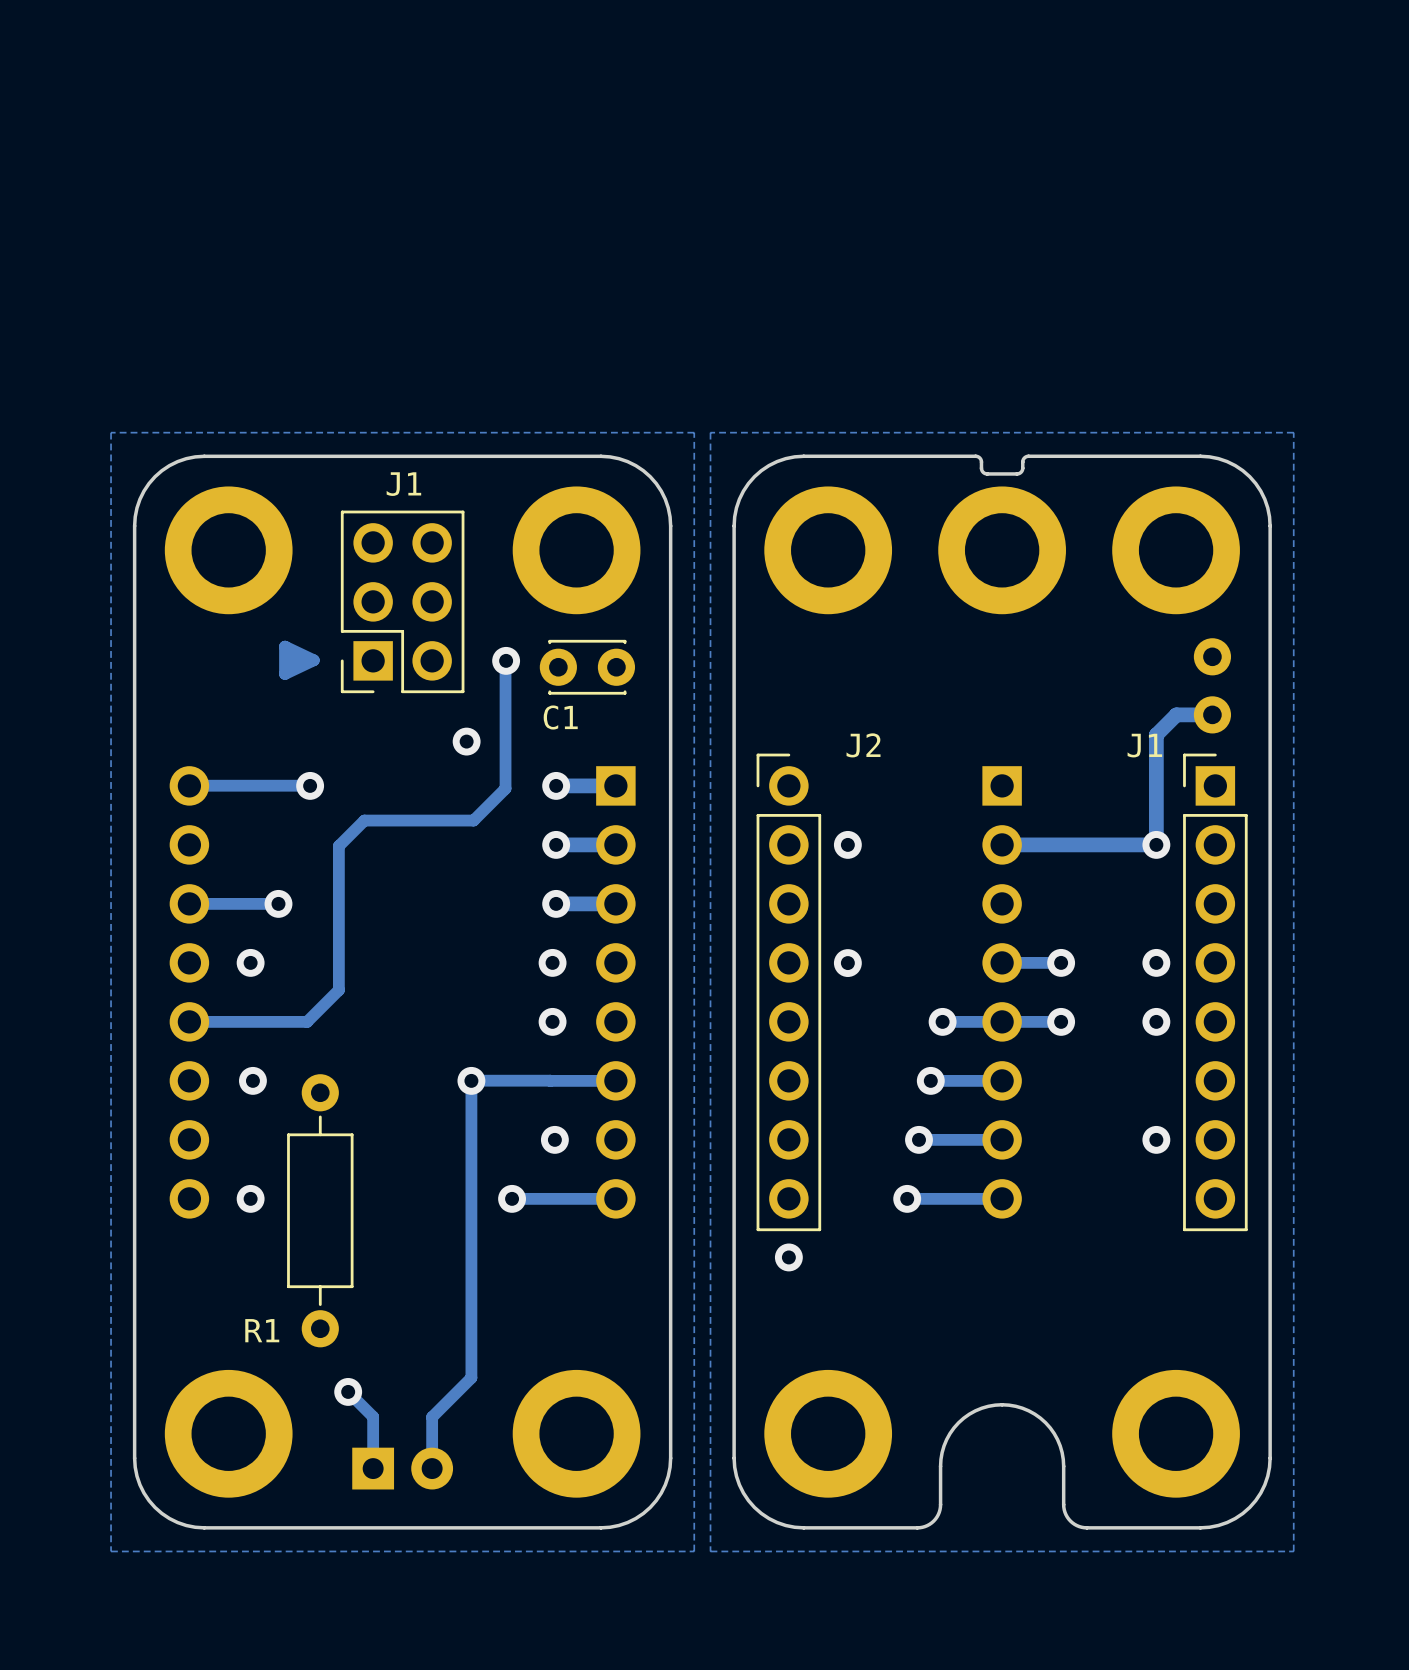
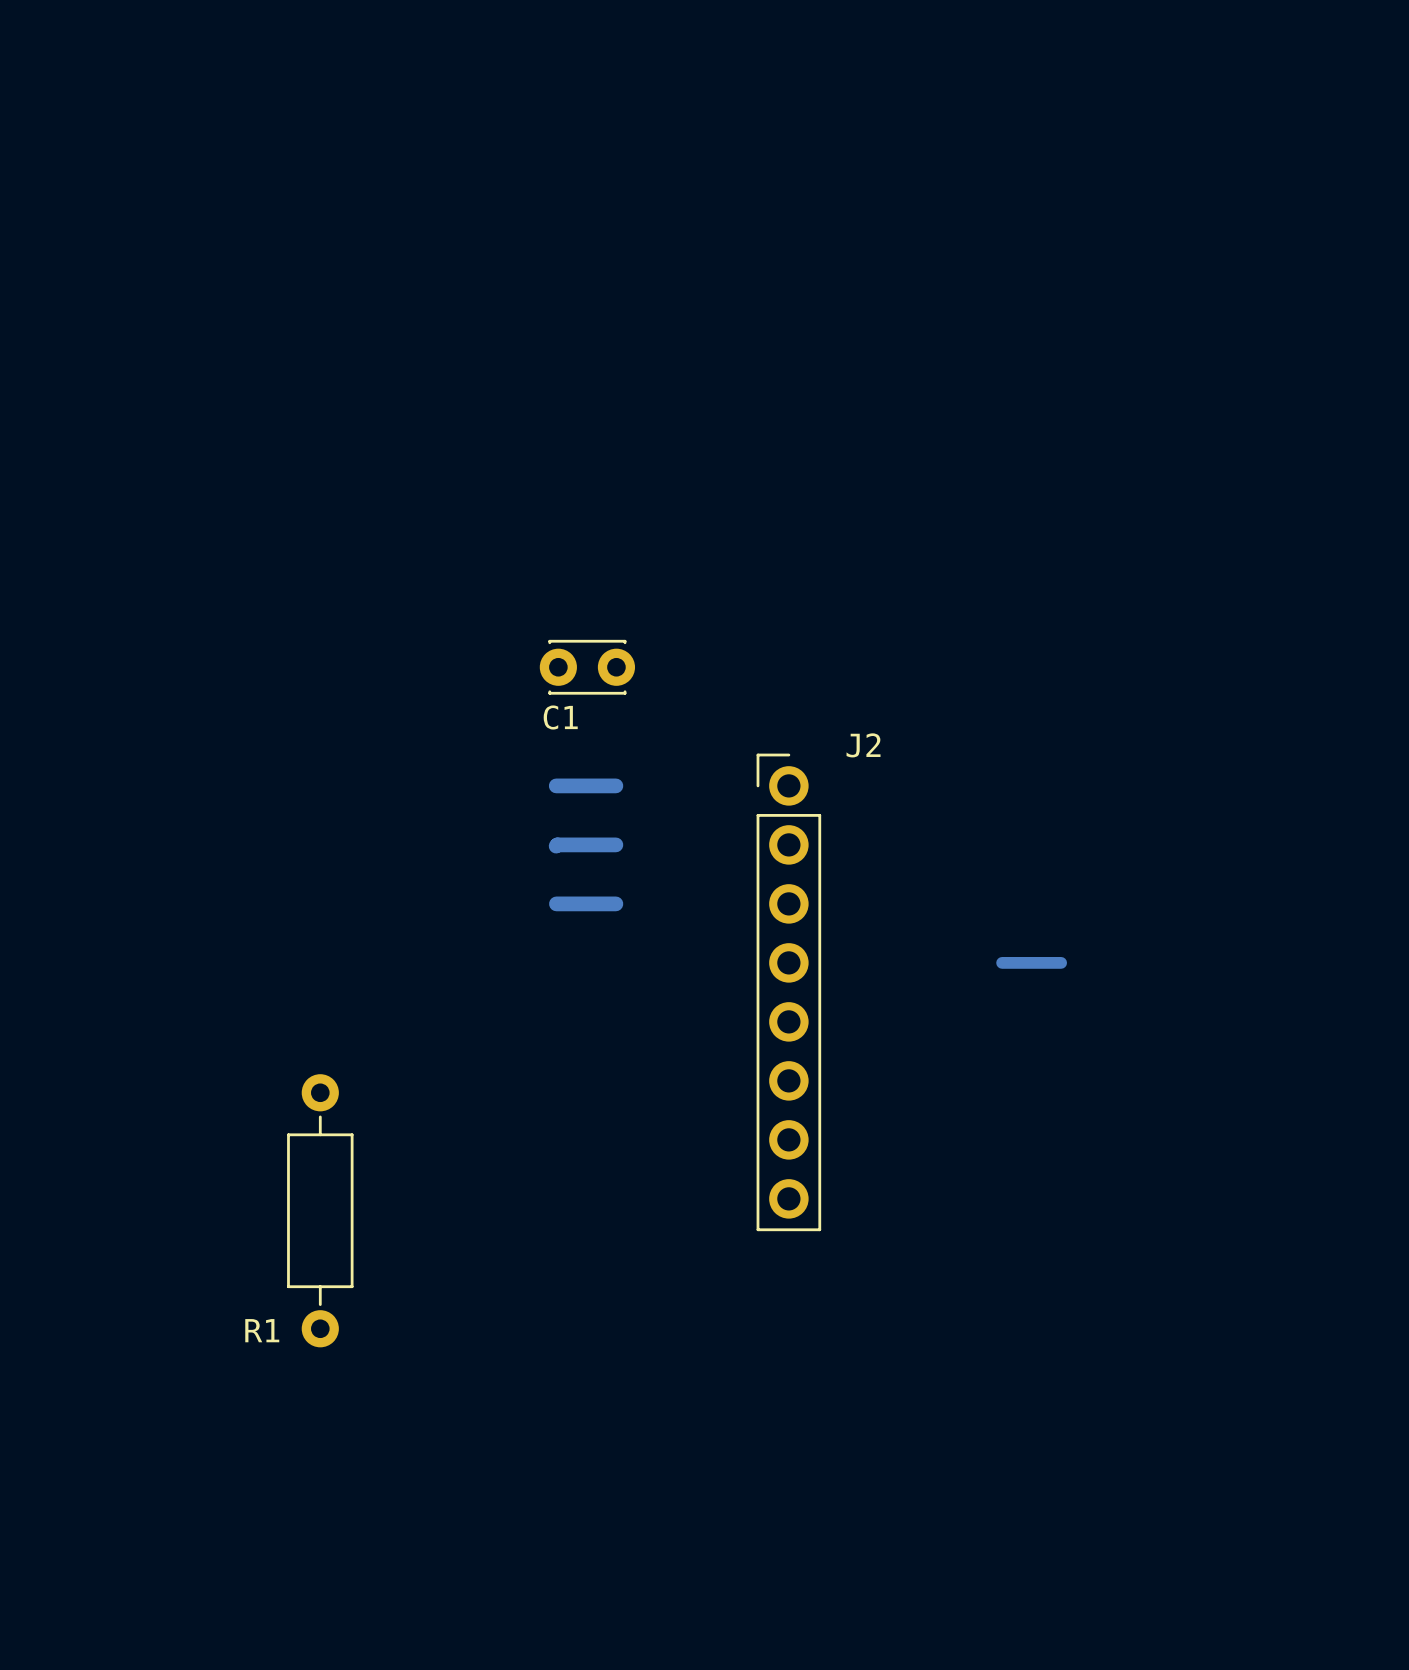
zone outline: (694, 432) (111, 432) (111, 1551) (694, 1551) (694, 432) -> none
zone outline: (1293, 432) (1293, 1551) (710, 1551) (710, 432) (1293, 432) -> none
board edge: (600, 456) (195, 456) (177, 461) (161, 470) (149, 483) (139, 499) (134, 525) (134, 1458) (139, 1484) (149, 1500) (161, 1513) (177, 1522) (204, 1527) (610, 1527) (627, 1522) (643, 1513) (656, 1500) (665, 1484) (670, 1458) (670, 525) (665, 499) (650, 476) (627, 461) (600, 456) -> none
board edge: (1200, 456) (1027, 456) (1023, 460) (1021, 471) (1016, 473) (984, 473) (981, 469) (980, 459) (976, 456) (794, 456) (777, 461) (761, 470) (748, 483) (739, 499) (734, 525) (734, 1458) (736, 1476) (743, 1493) (761, 1513) (777, 1522) (803, 1527) (917, 1527) (927, 1525) (935, 1519) (939, 1509) (940, 1459) (944, 1445) (950, 1433) (958, 1422) (969, 1414) (981, 1408) (995, 1405) (1015, 1406) (1028, 1410) (1045, 1422) (1054, 1433) (1060, 1445) (1063, 1459) (1064, 1509) (1070, 1521) (1079, 1526) (1200, 1527) (1218, 1525) (1242, 1513) (1255, 1500) (1264, 1484) (1270, 1458) (1270, 525) (1264, 499) (1249, 476) (1227, 461) (1200, 456) -> none
part: (228, 550) -> none
part: (576, 550) -> none
part: (828, 550) -> none
part: (1002, 550) -> none
part: (1176, 550) -> none
J1: (402, 601) -> none
drawing: [279, 640, 320, 680] -> none
track: (505, 660) (505, 788) (473, 820) (364, 820) (338, 846) (338, 990) (307, 1021) (189, 1021) -> none
via: (506, 660) -> none
part: (1212, 685) -> none
track: (1212, 714) (1176, 714) (1156, 734) (1156, 844) (1002, 844) -> none
via: (466, 741) -> none
track: (310, 785) (189, 785) -> none
via: (310, 785) -> none
via: (556, 785) -> none
via: (556, 844) -> none
via: (847, 844) -> none
via: (1156, 844) -> none
track: (278, 903) (189, 903) -> none
via: (278, 903) -> none
via: (556, 903) -> none
via: (250, 962) -> none
via: (552, 962) -> none
via: (1061, 962) -> none
via: (1156, 962) -> none
via: (847, 963) -> none
part: (189, 992) -> none
part: (615, 992) -> none
part: (1002, 992) -> none
J1: (1215, 992) -> none
via: (552, 1021) -> none
via: (942, 1021) -> none
track: (1061, 1021) (942, 1021) -> none
via: (1061, 1021) -> none
via: (1156, 1021) -> none
via: (252, 1080) -> none
via: (471, 1080) -> none
track: (550, 1080) (471, 1080) (471, 1377) (432, 1417) (432, 1468) -> none
track: (615, 1080) (550, 1080) -> none
via: (930, 1080) -> none
track: (1002, 1080) (930, 1080) -> none
via: (554, 1139) -> none
via: (919, 1139) -> none
track: (1002, 1139) (919, 1139) -> none
via: (1156, 1139) -> none
via: (250, 1198) -> none
via: (512, 1198) -> none
track: (615, 1198) (512, 1198) -> none
via: (907, 1198) -> none
track: (1002, 1198) (907, 1198) -> none
via: (788, 1257) -> none
track: (348, 1391) (373, 1416) (373, 1468) -> none
via: (348, 1391) -> none
part: (228, 1433) -> none
part: (576, 1433) -> none
part: (828, 1433) -> none
part: (1176, 1433) -> none
part: (402, 1468) -> none

